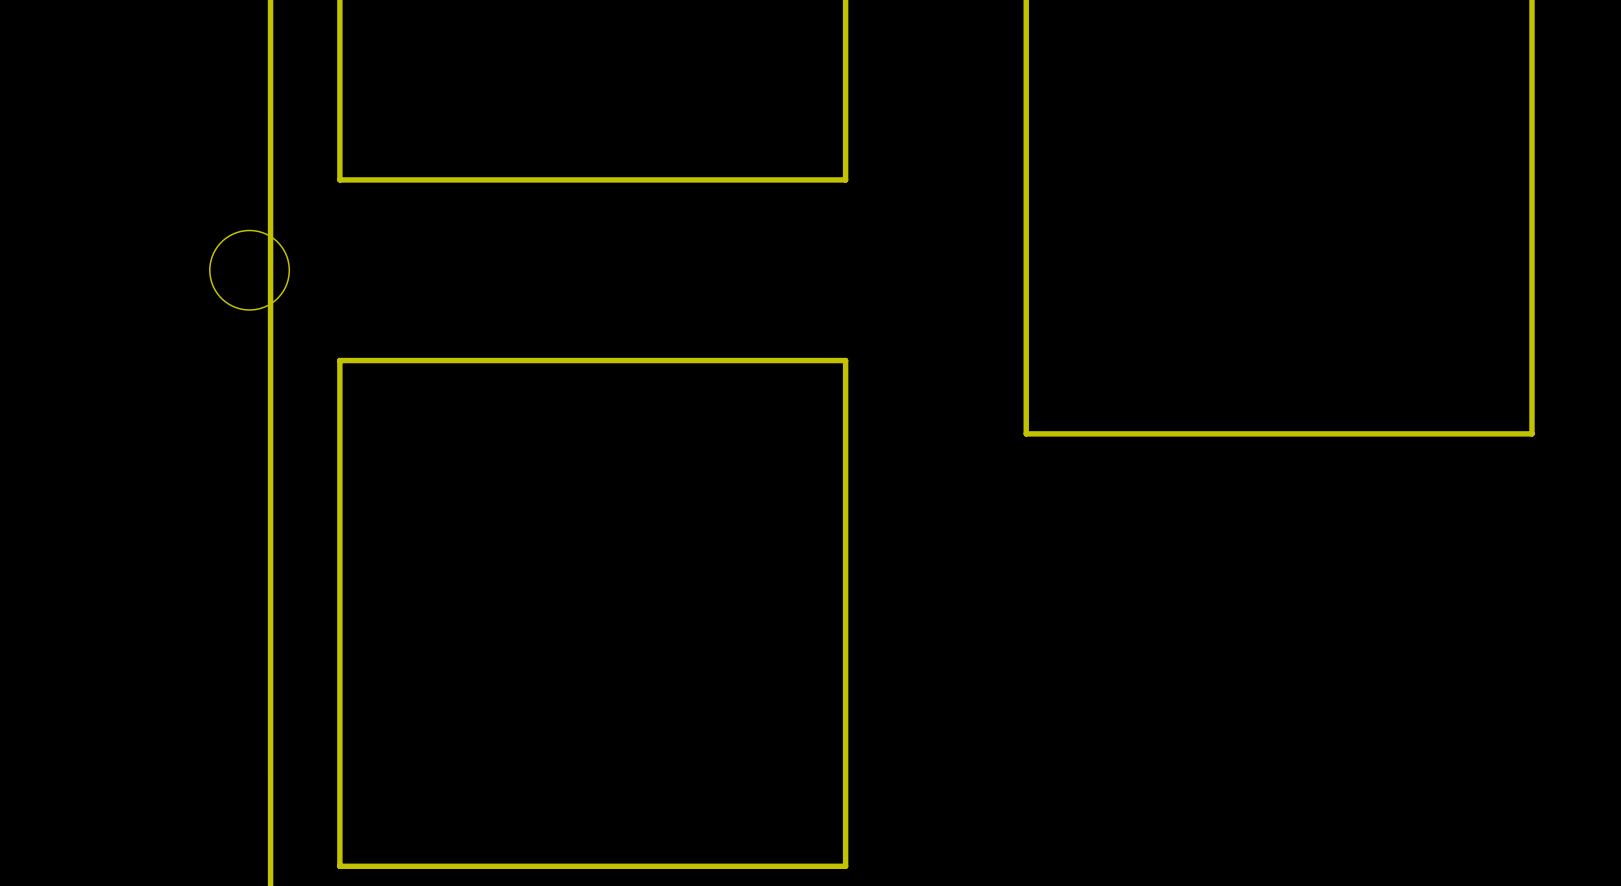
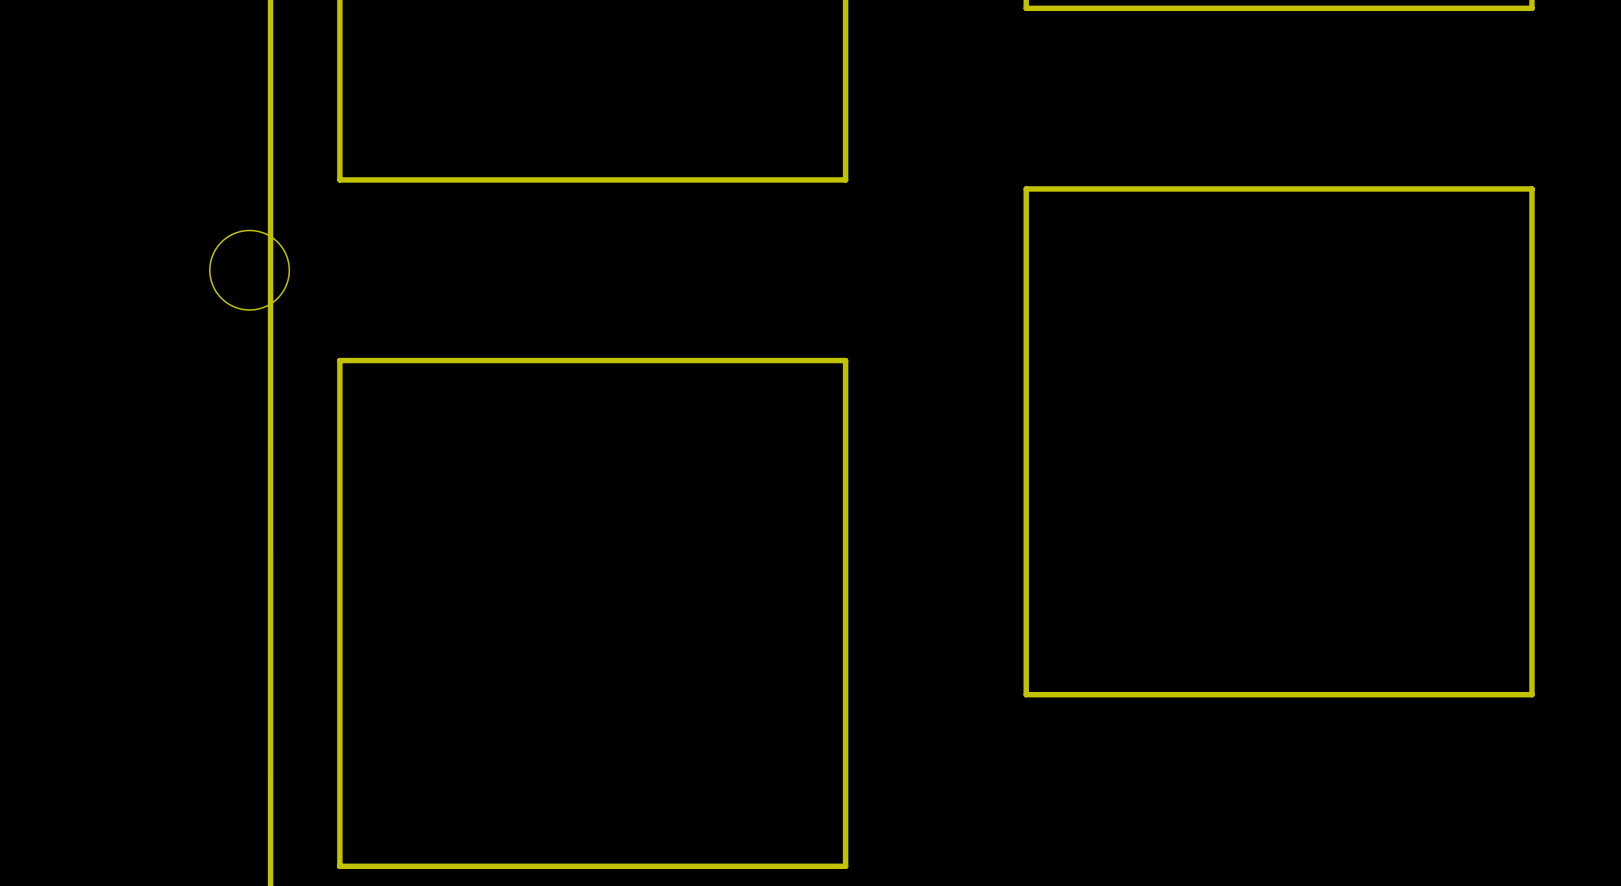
board edge: (1026, 8) (1026, 188) -> (1026, 8) (1531, 8)
board edge: (1531, 8) (1531, 188) -> (1026, 188) (1531, 188)
board edge: (1026, 433) (1531, 433) -> (1026, 433) (1026, 694) (1531, 694) (1531, 433)

